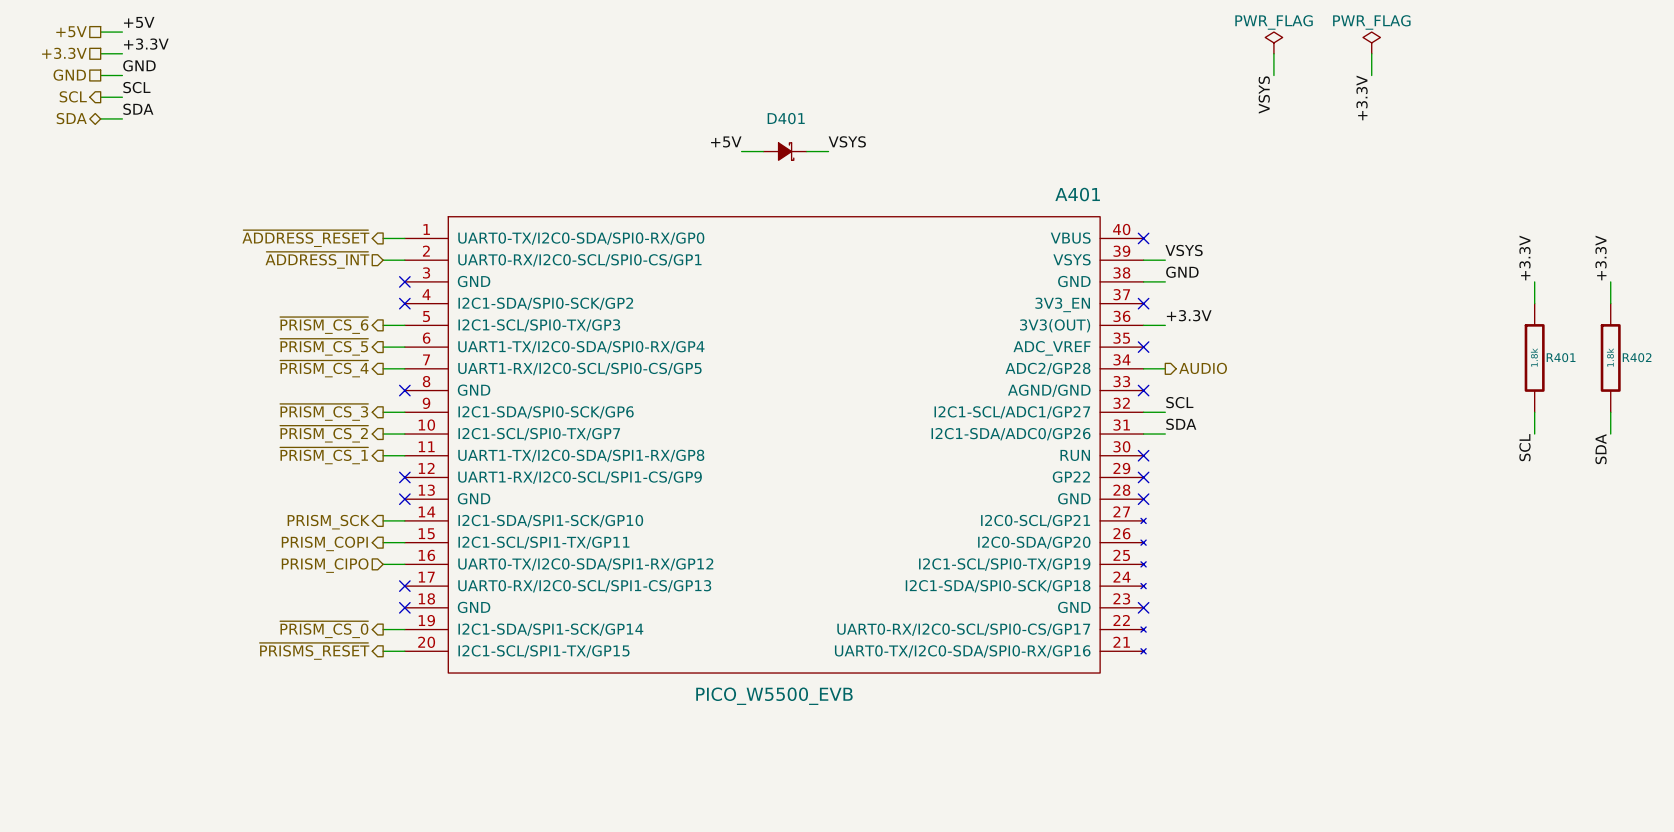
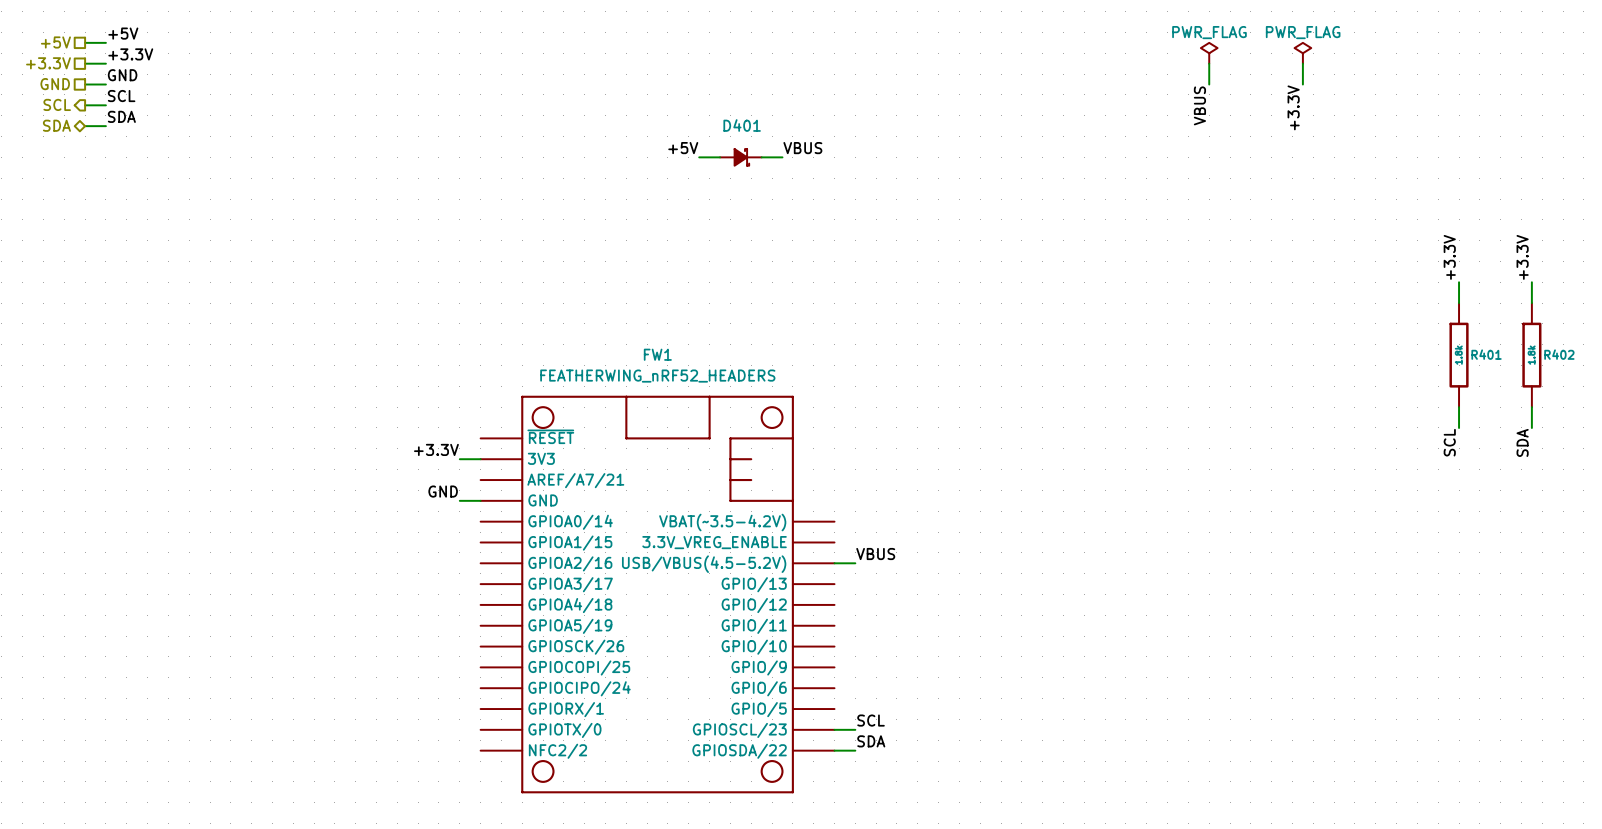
label: VSYS (1264, 94) -> VBUS (1199, 105)
label: VSYS (847, 141) -> VBUS (802, 148)
hierarchical label: ~{ADDRESS_RESET} (305, 238) -> none
wire: (383, 238) (404, 238) -> none
no-connect mark: (1143, 238) -> none
label: VSYS (1184, 250) -> none
hierarchical label: ~{ADDRESS_INT} (317, 260) -> none
wire: (383, 260) (404, 260) -> none
wire: (1143, 260) (1165, 260) -> none
label: GND (1182, 272) -> none
no-connect mark: (404, 281) -> none
wire: (1143, 281) (1165, 281) -> none
no-connect mark: (404, 303) -> none
no-connect mark: (1143, 303) -> none
label: +3.3V (1189, 315) -> none
hierarchical label: ~{PRISM_CS_6} (324, 325) -> none
wire: (383, 325) (404, 325) -> none
wire: (1143, 325) (1165, 325) -> none
hierarchical label: ~{PRISM_CS_5} (324, 347) -> none
wire: (383, 347) (404, 347) -> none
no-connect mark: (1143, 347) -> none
hierarchical label: ~{PRISM_CS_4} (324, 368) -> none
wire: (383, 368) (404, 368) -> none
wire: (1143, 368) (1165, 368) -> none
hierarchical label: AUDIO (1203, 368) -> none
no-connect mark: (404, 390) -> none
no-connect mark: (1143, 390) -> none
label: SCL (1179, 402) -> none
hierarchical label: ~{PRISM_CS_3} (324, 412) -> none
wire: (383, 412) (404, 412) -> (459, 459) (480, 459)
wire: (1143, 412) (1165, 412) -> none
label: SDA (1181, 424) -> none
hierarchical label: ~{PRISM_CS_2} (324, 434) -> none
wire: (383, 434) (404, 434) -> none
wire: (1143, 434) (1165, 434) -> none
A401: PICO_W5500_EVB (775, 444) -> none
hierarchical label: ~{PRISM_CS_1} (324, 455) -> none
wire: (383, 455) (404, 455) -> (459, 500) (480, 500)
no-connect mark: (1143, 455) -> none
label: none -> +3.3V (436, 449)
no-connect mark: (404, 477) -> none
no-connect mark: (1143, 477) -> none
no-connect mark: (404, 499) -> none
no-connect mark: (1143, 499) -> none
label: none -> GND (443, 491)
wire: (383, 520) (404, 520) -> none
hierarchical label: PRISM_SCK (328, 522) -> none
wire: (383, 542) (404, 542) -> none
hierarchical label: PRISM_COPI (324, 543) -> none
wire: (383, 564) (404, 564) -> none
hierarchical label: PRISM_CIPO (325, 565) -> none
label: none -> VBUS (875, 554)
wire: none -> (834, 563) (855, 563)
no-connect mark: (404, 586) -> none
no-connect mark: (404, 607) -> none
FW1: none -> FEATHERWING_nRF52_HEADERS (657, 594)
no-connect mark: (1143, 607) -> none
hierarchical label: ~{PRISM_CS_0} (324, 629) -> none
wire: (383, 629) (404, 629) -> none
hierarchical label: ~{PRISMS_RESET} (314, 651) -> none
wire: (383, 651) (404, 651) -> none
label: none -> SCL (871, 720)
wire: none -> (834, 729) (855, 729)
label: none -> SDA (871, 741)
wire: none -> (834, 750) (855, 750)

